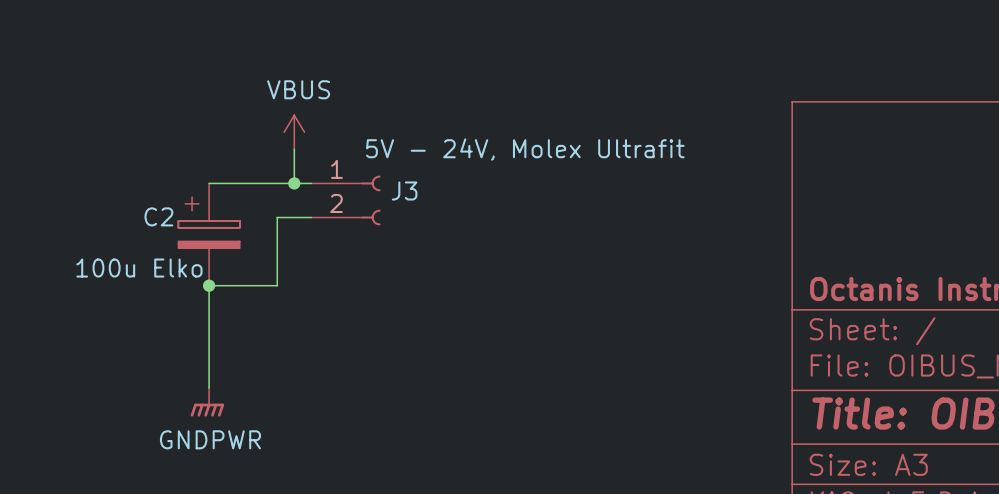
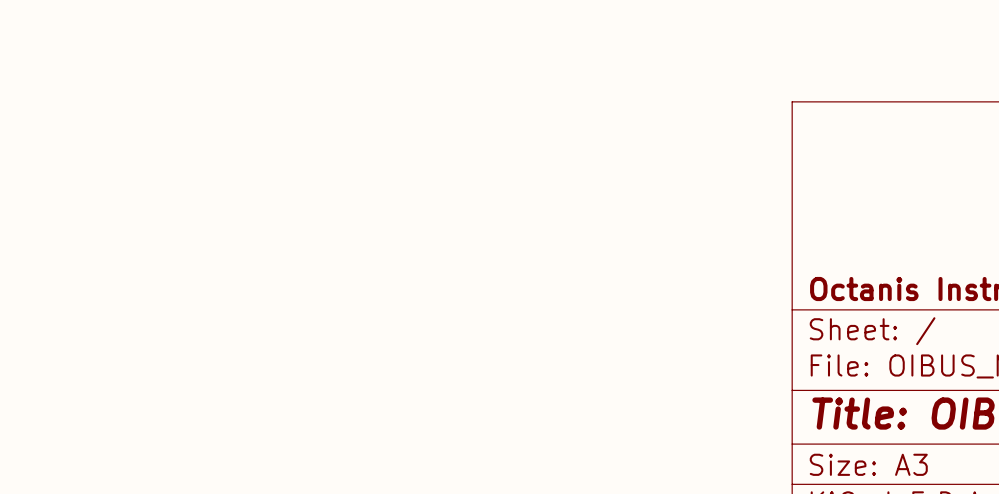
power symbol: VBUS (294, 132) -> none
wire: (294, 149) (294, 183) -> none
wire: (209, 183) (311, 183) -> none
junction: (294, 183) -> none
J3: 5V - 24V, Molex Ultrafit (345, 200) -> none
wire: (311, 217) (277, 217) (277, 285) (209, 285) (209, 387) -> none
C2: 100u Elko (209, 234) -> none
junction: (209, 285) -> none
power symbol: GNDPWR (207, 402) -> none

